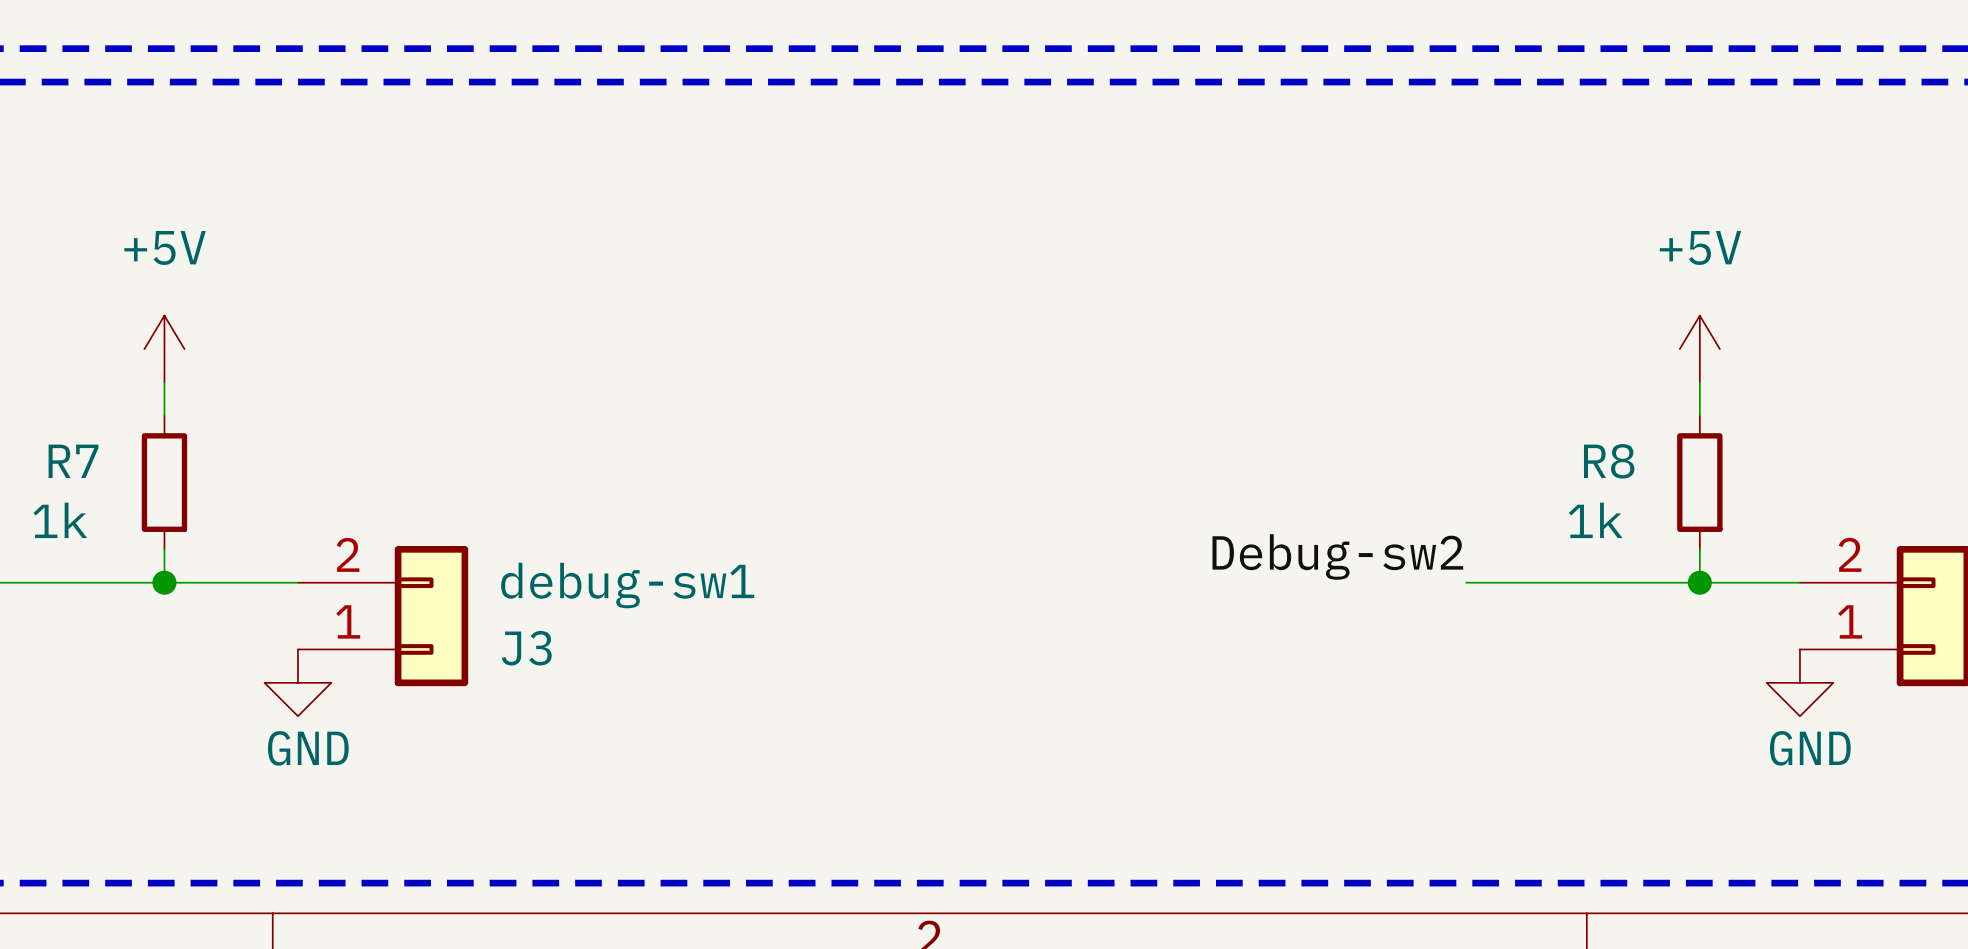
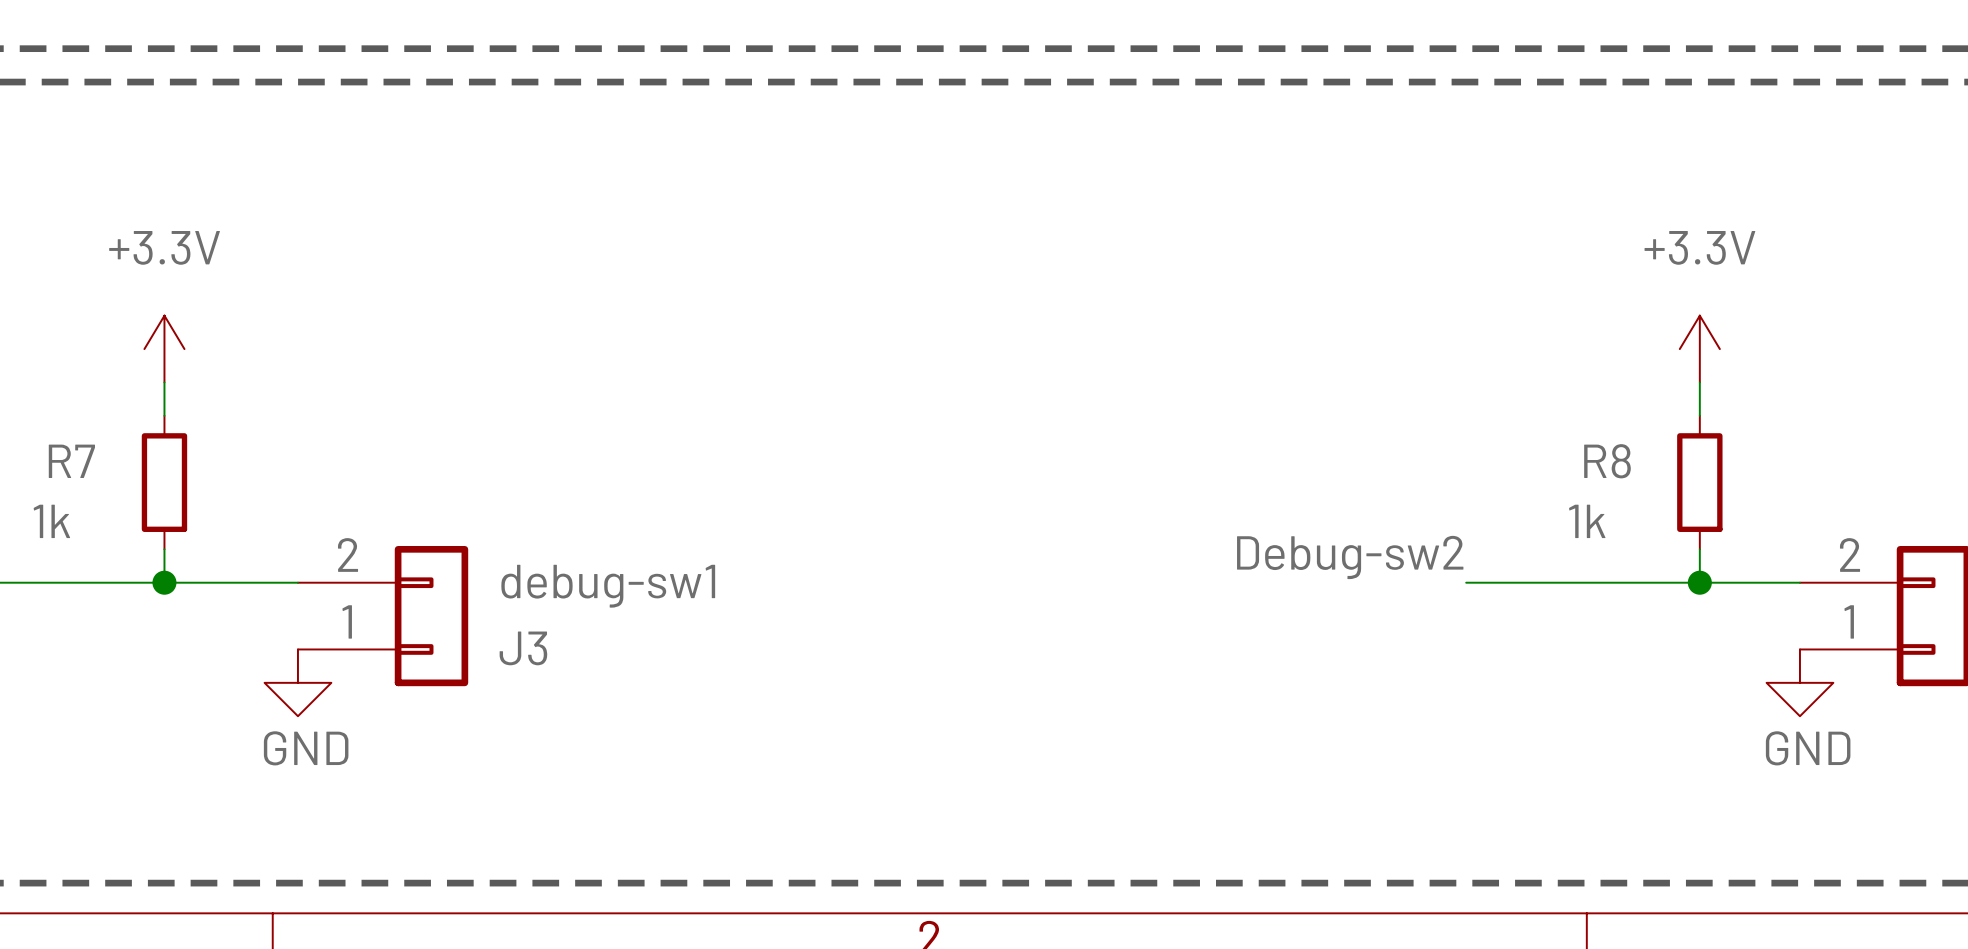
power symbol: +5V (164, 349) -> +3.3V (164, 349)
power symbol: +5V (1699, 349) -> +3.3V (1699, 349)

